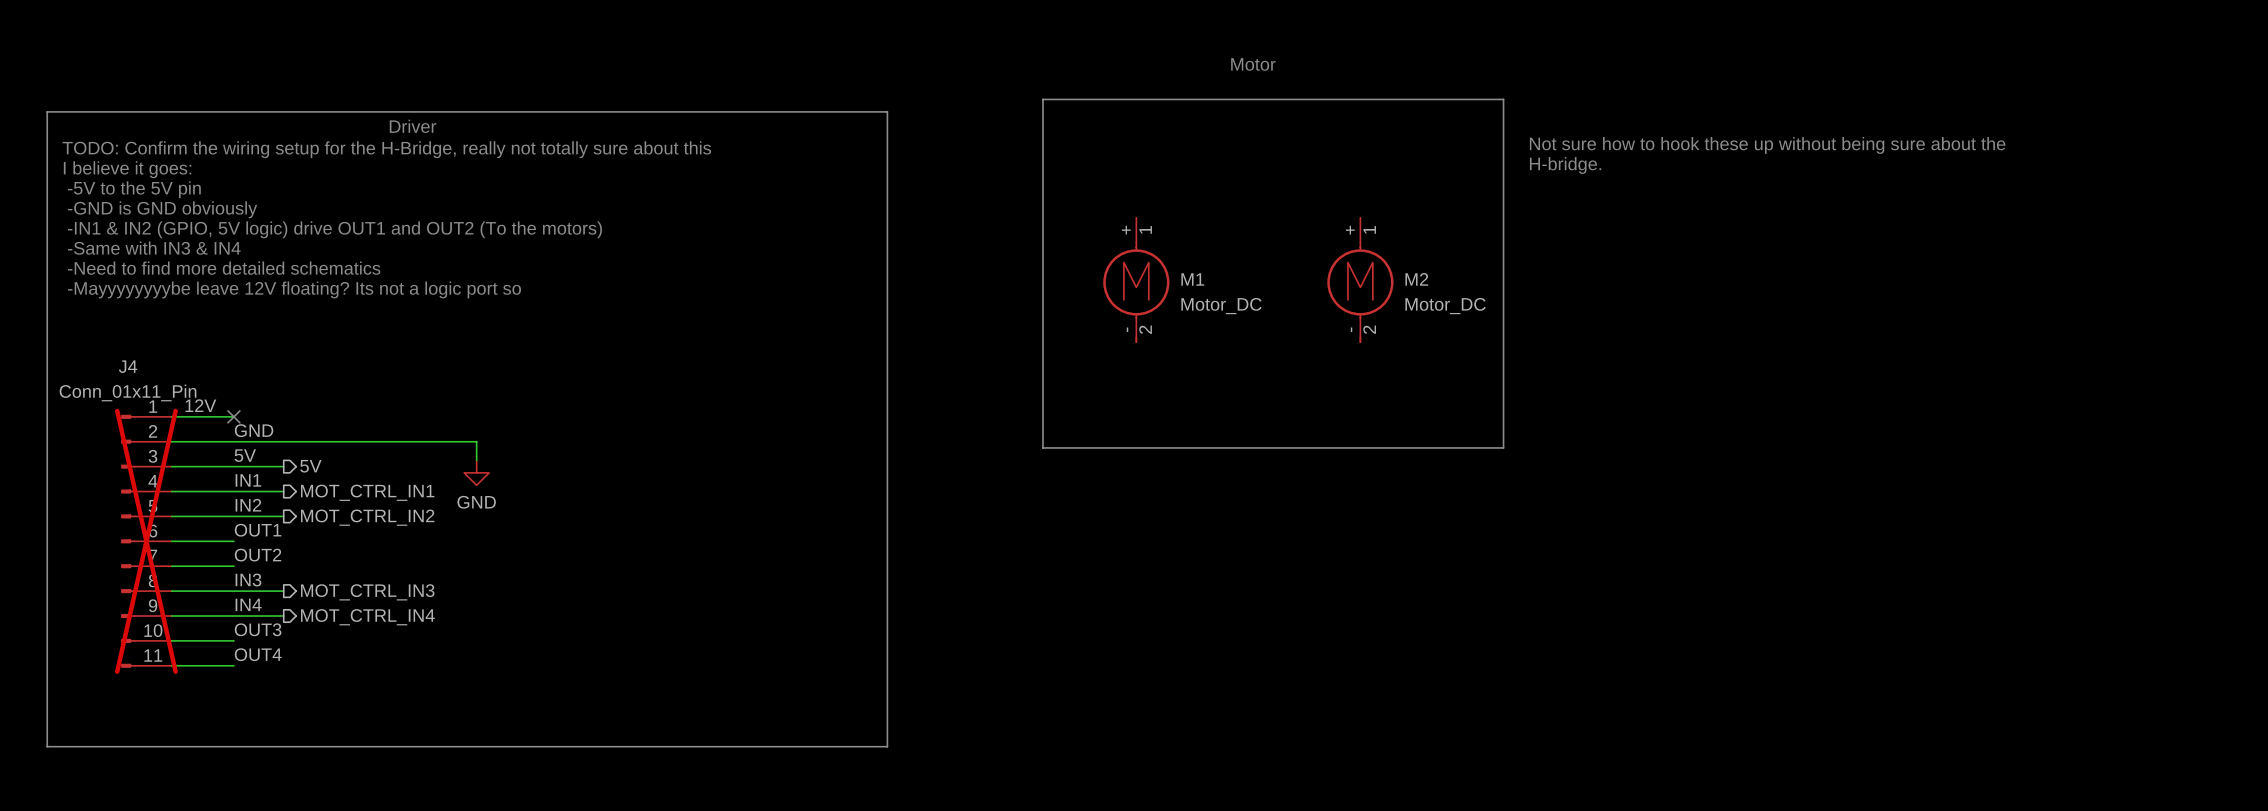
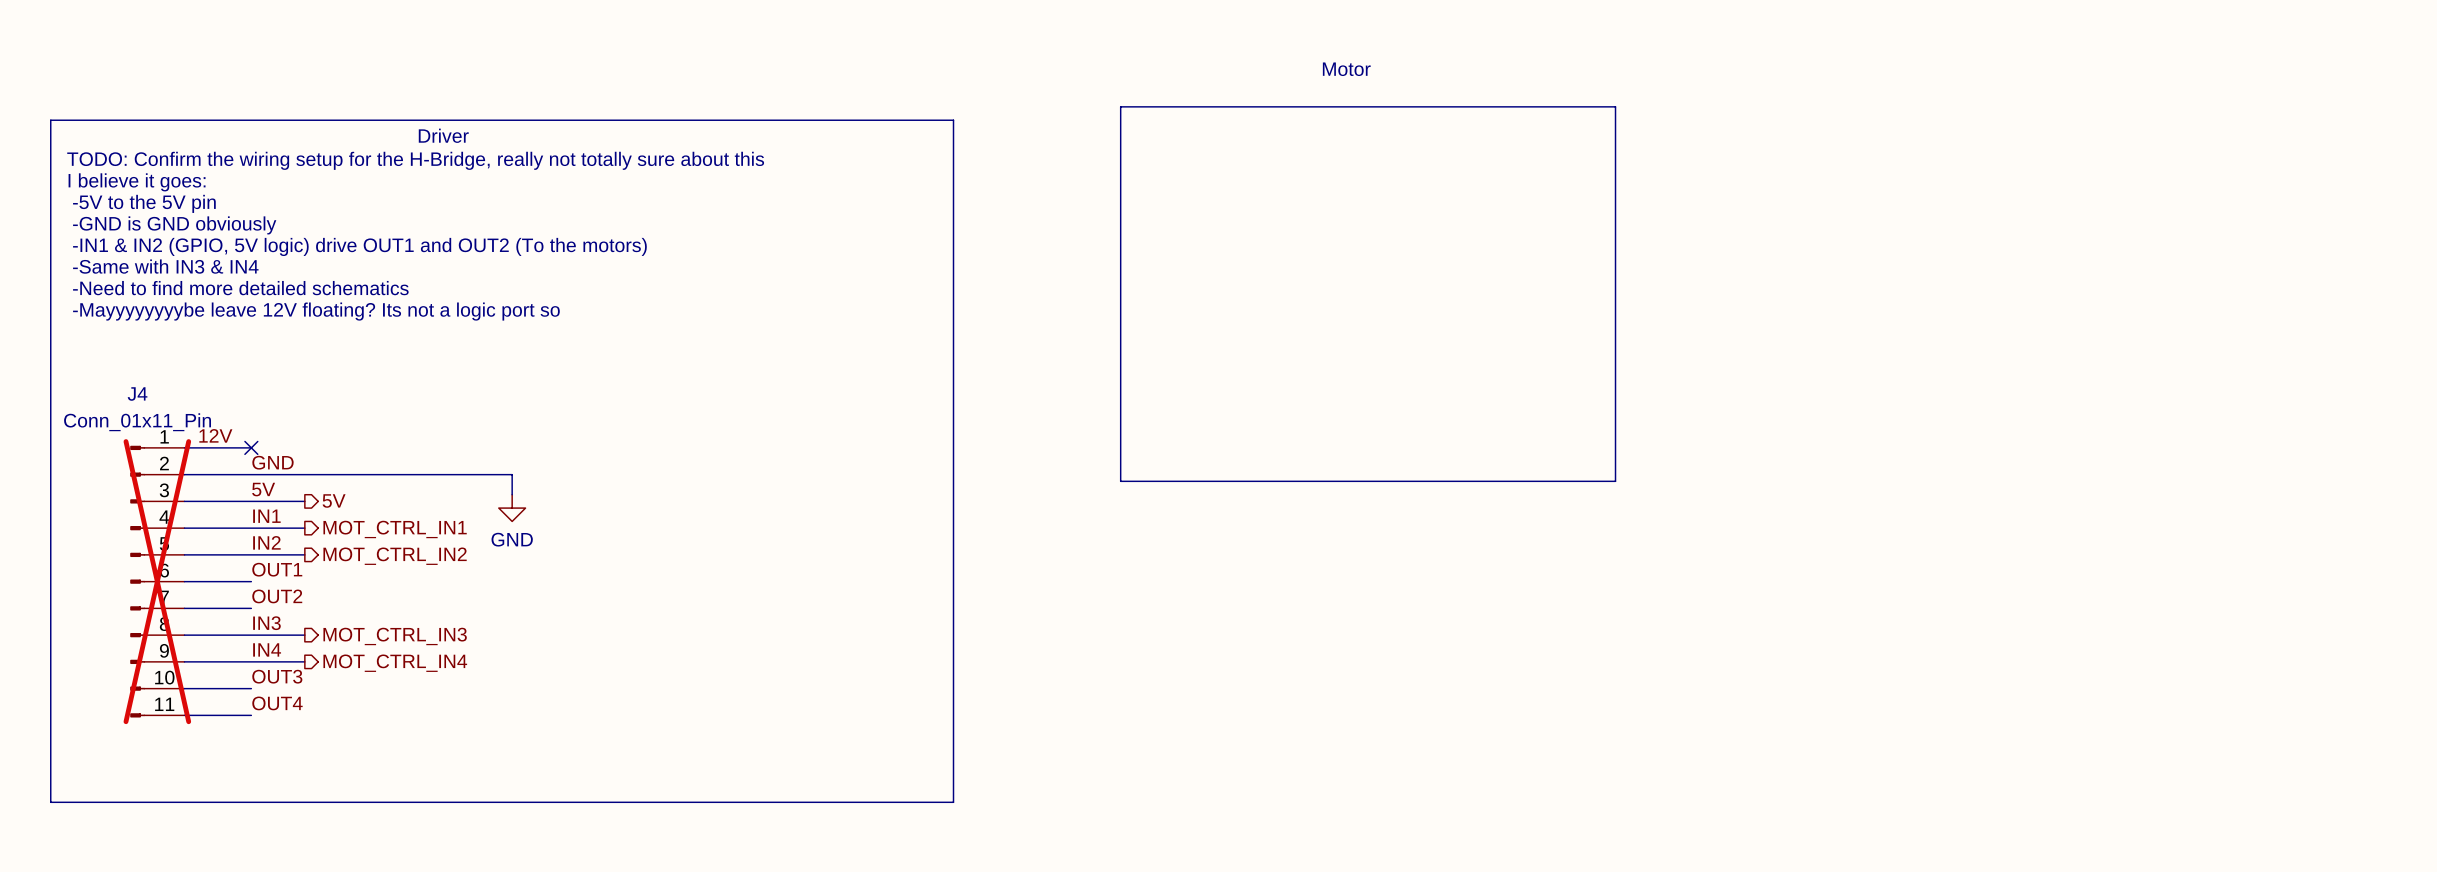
text: Not sure how to hook these up without being sure about the (1767, 145) -> none
text: H-bridge. (1565, 165) -> none
M1: Motor_DC (1136, 279) -> none
M2: Motor_DC (1360, 279) -> none

